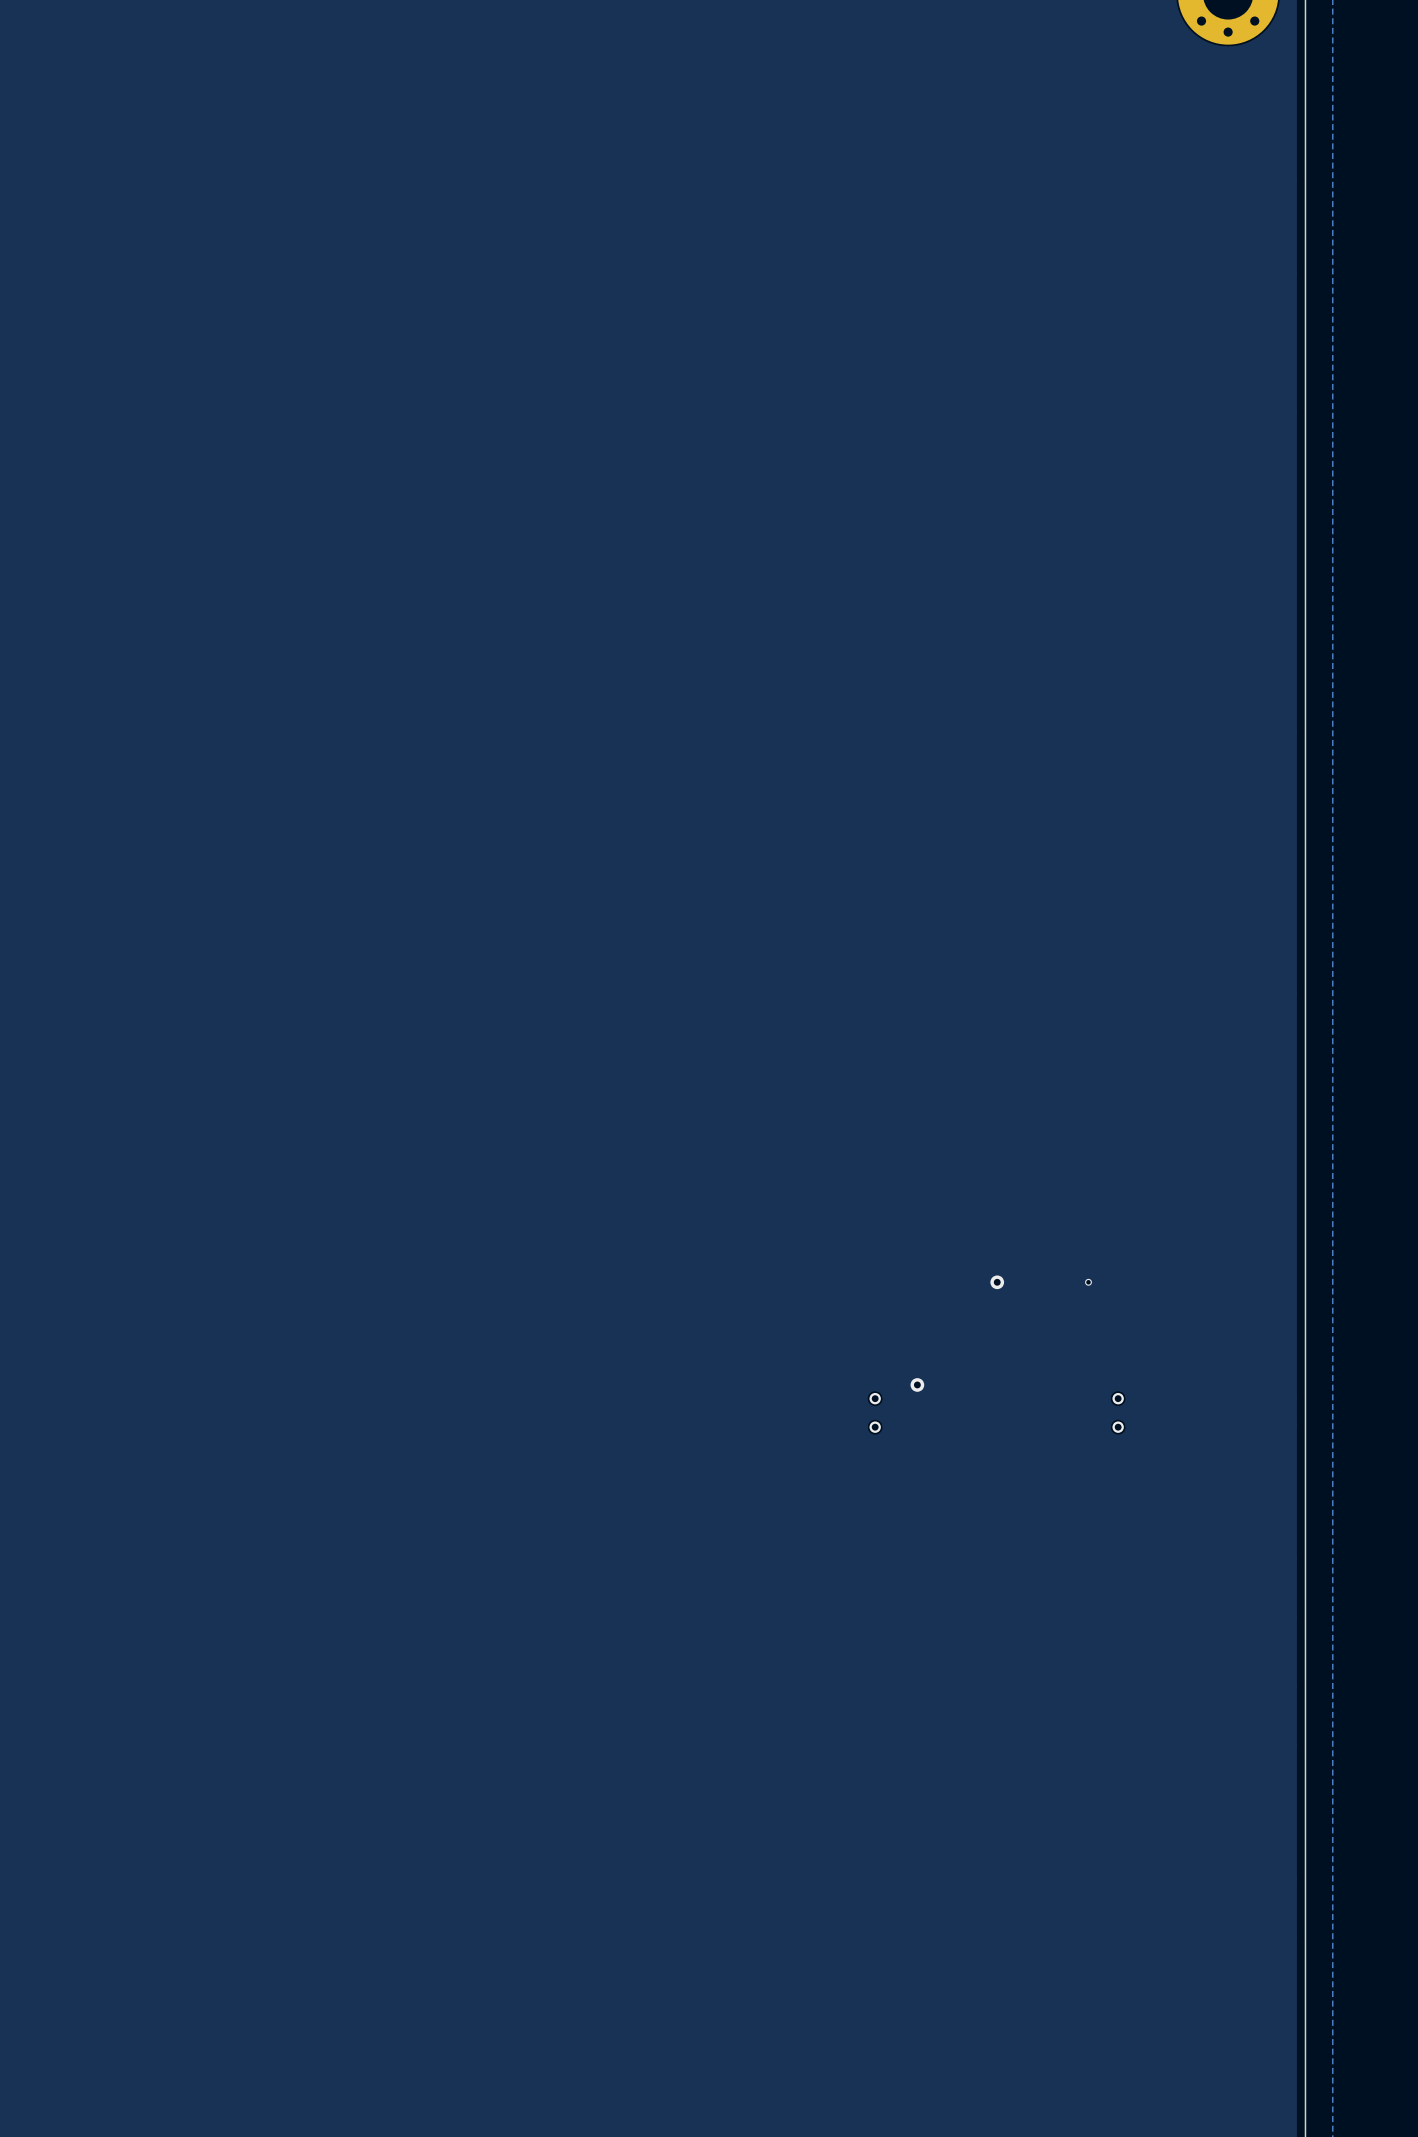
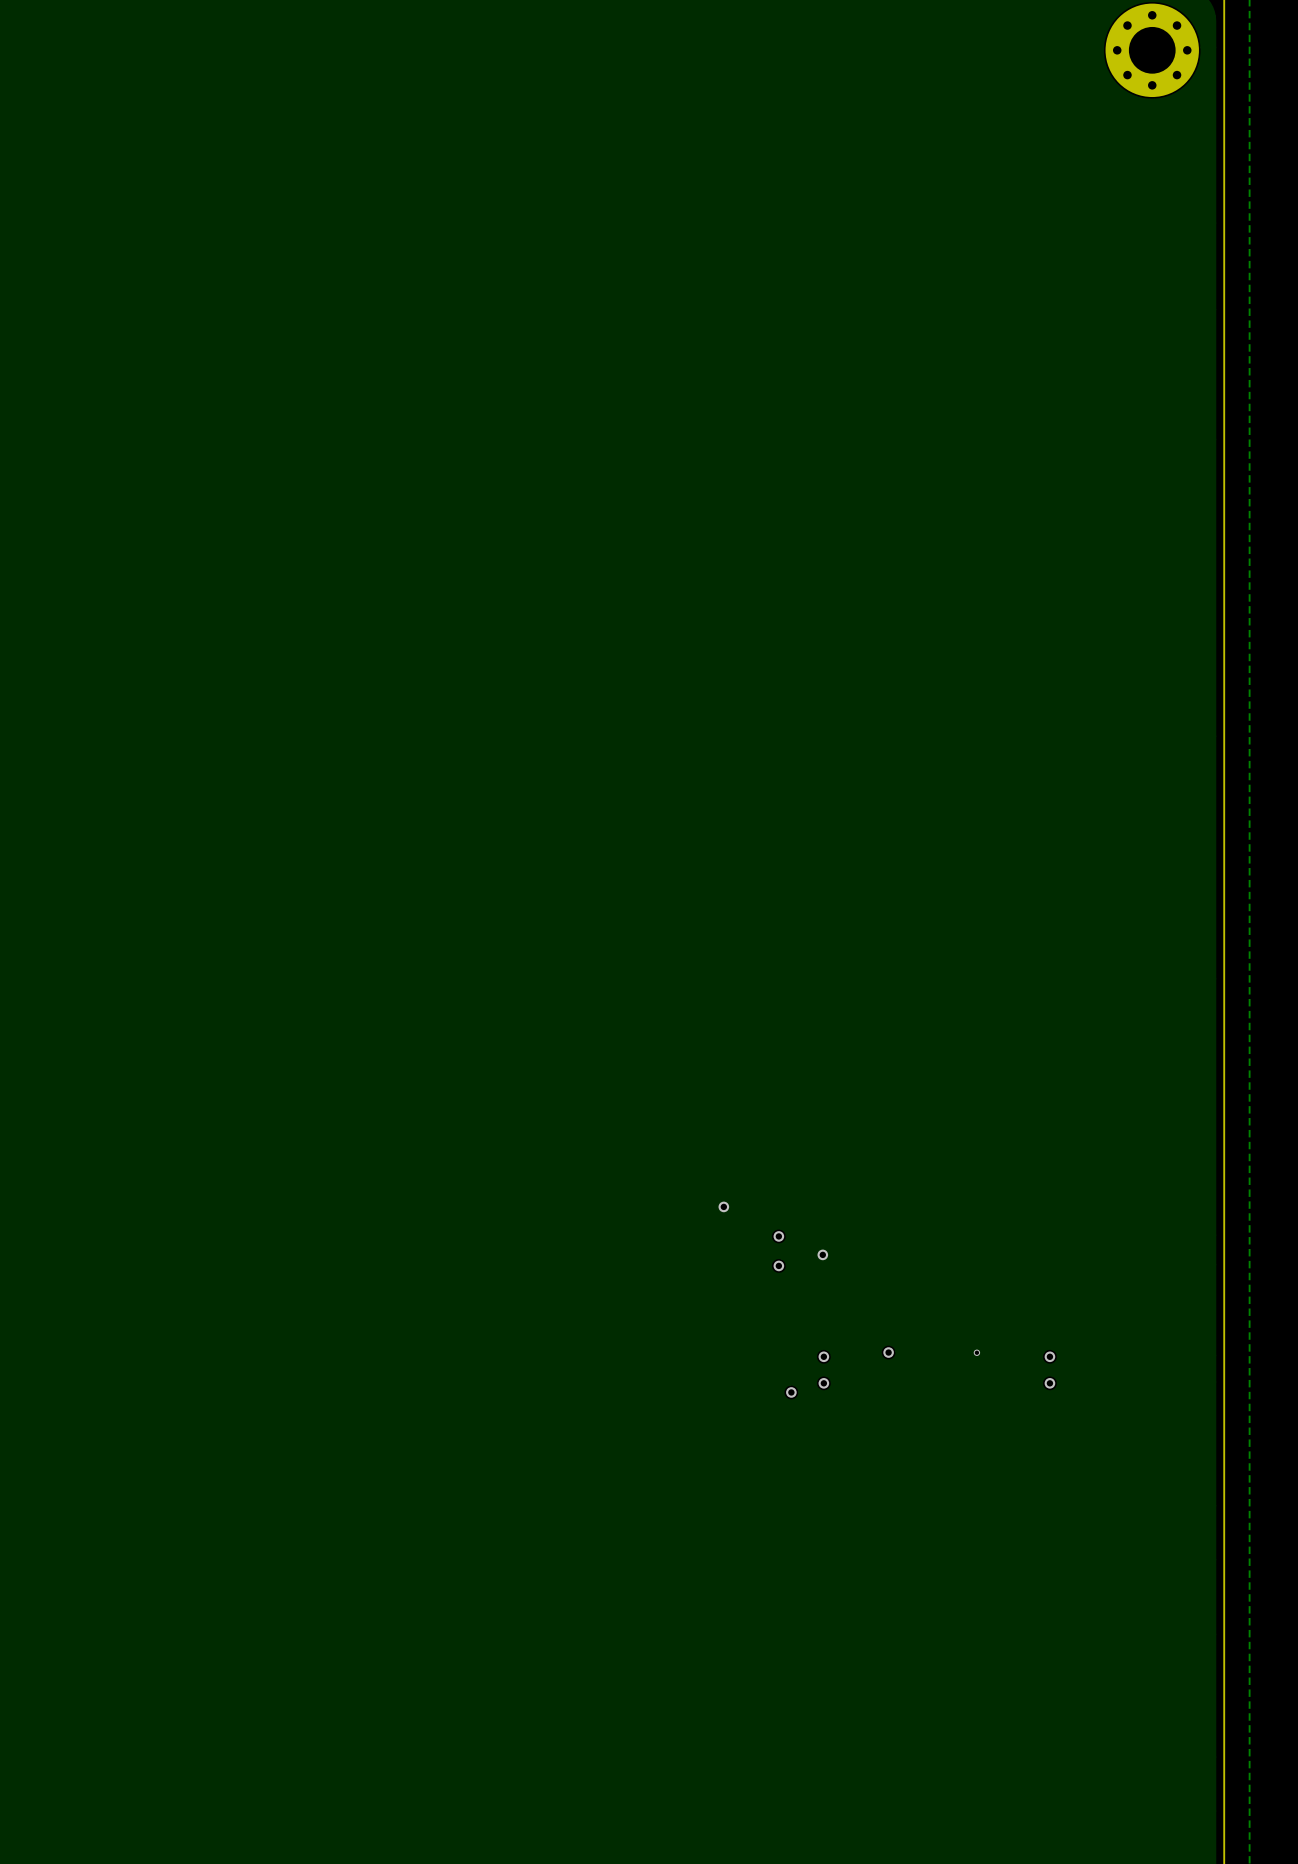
via: none -> (723, 1206)
via: none -> (778, 1236)
via: (997, 1282) -> none
via position: (1088, 1282) -> (976, 1352)
via: none -> (822, 1254)
via: none -> (778, 1265)
via: (917, 1384) -> none
via: none -> (888, 1352)
via: none -> (791, 1392)

